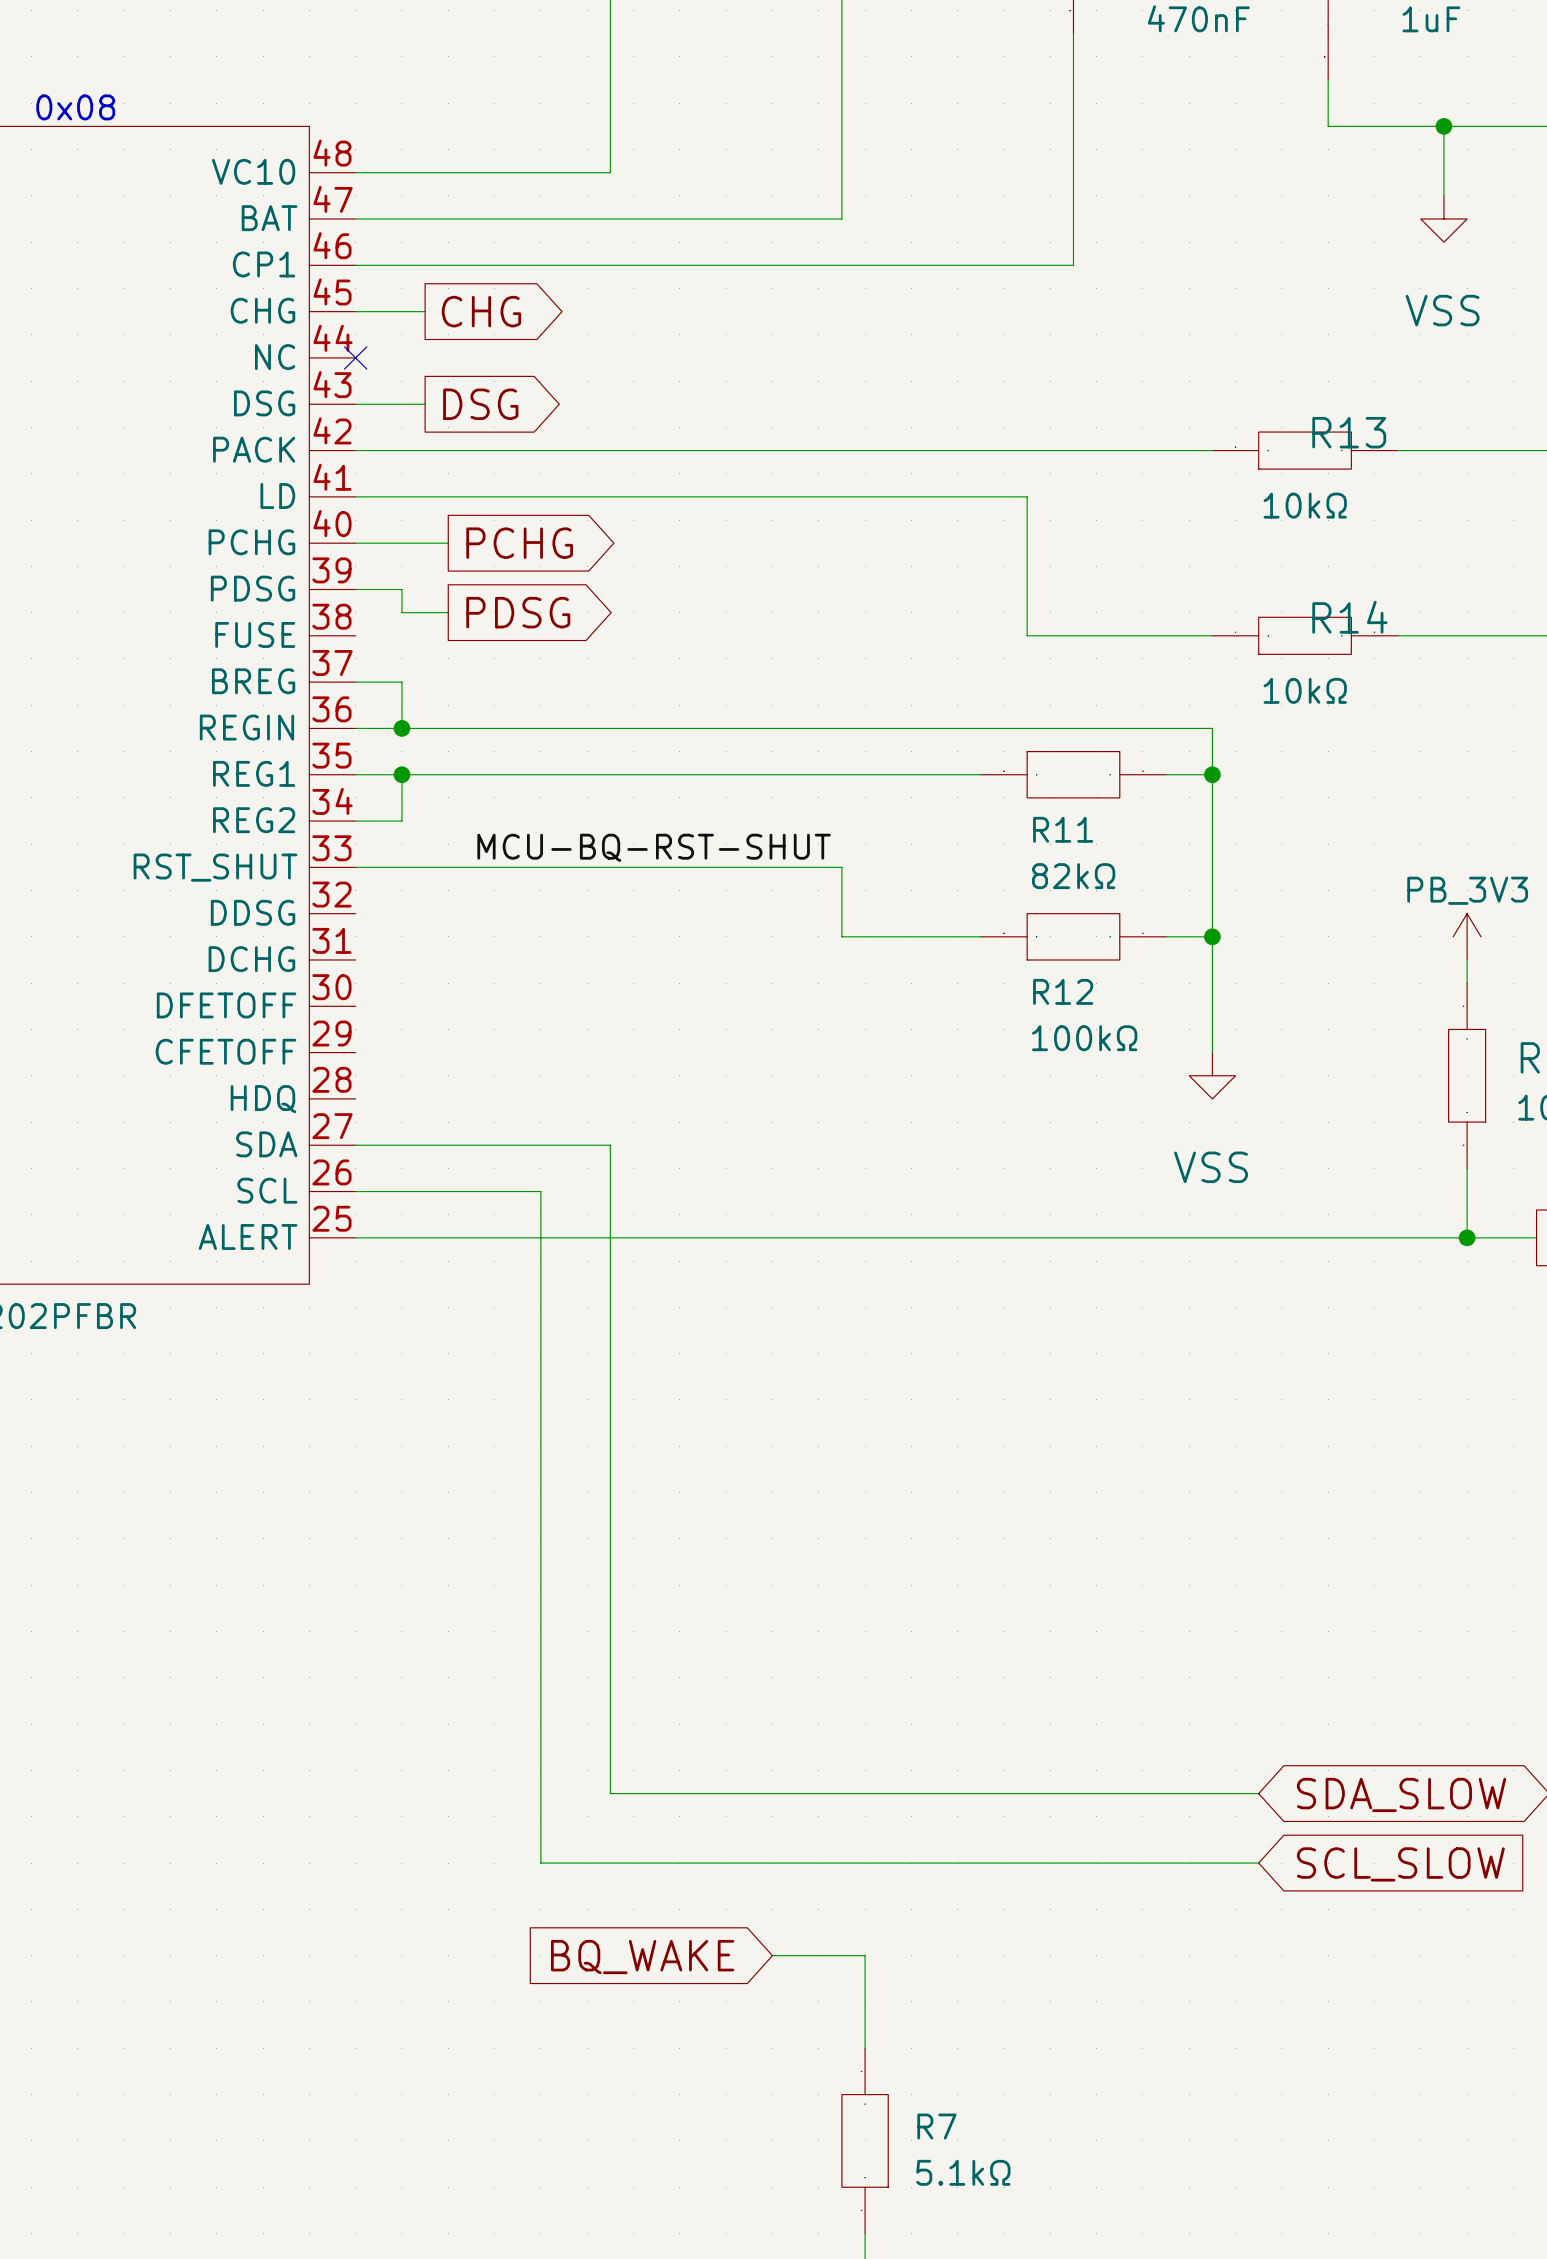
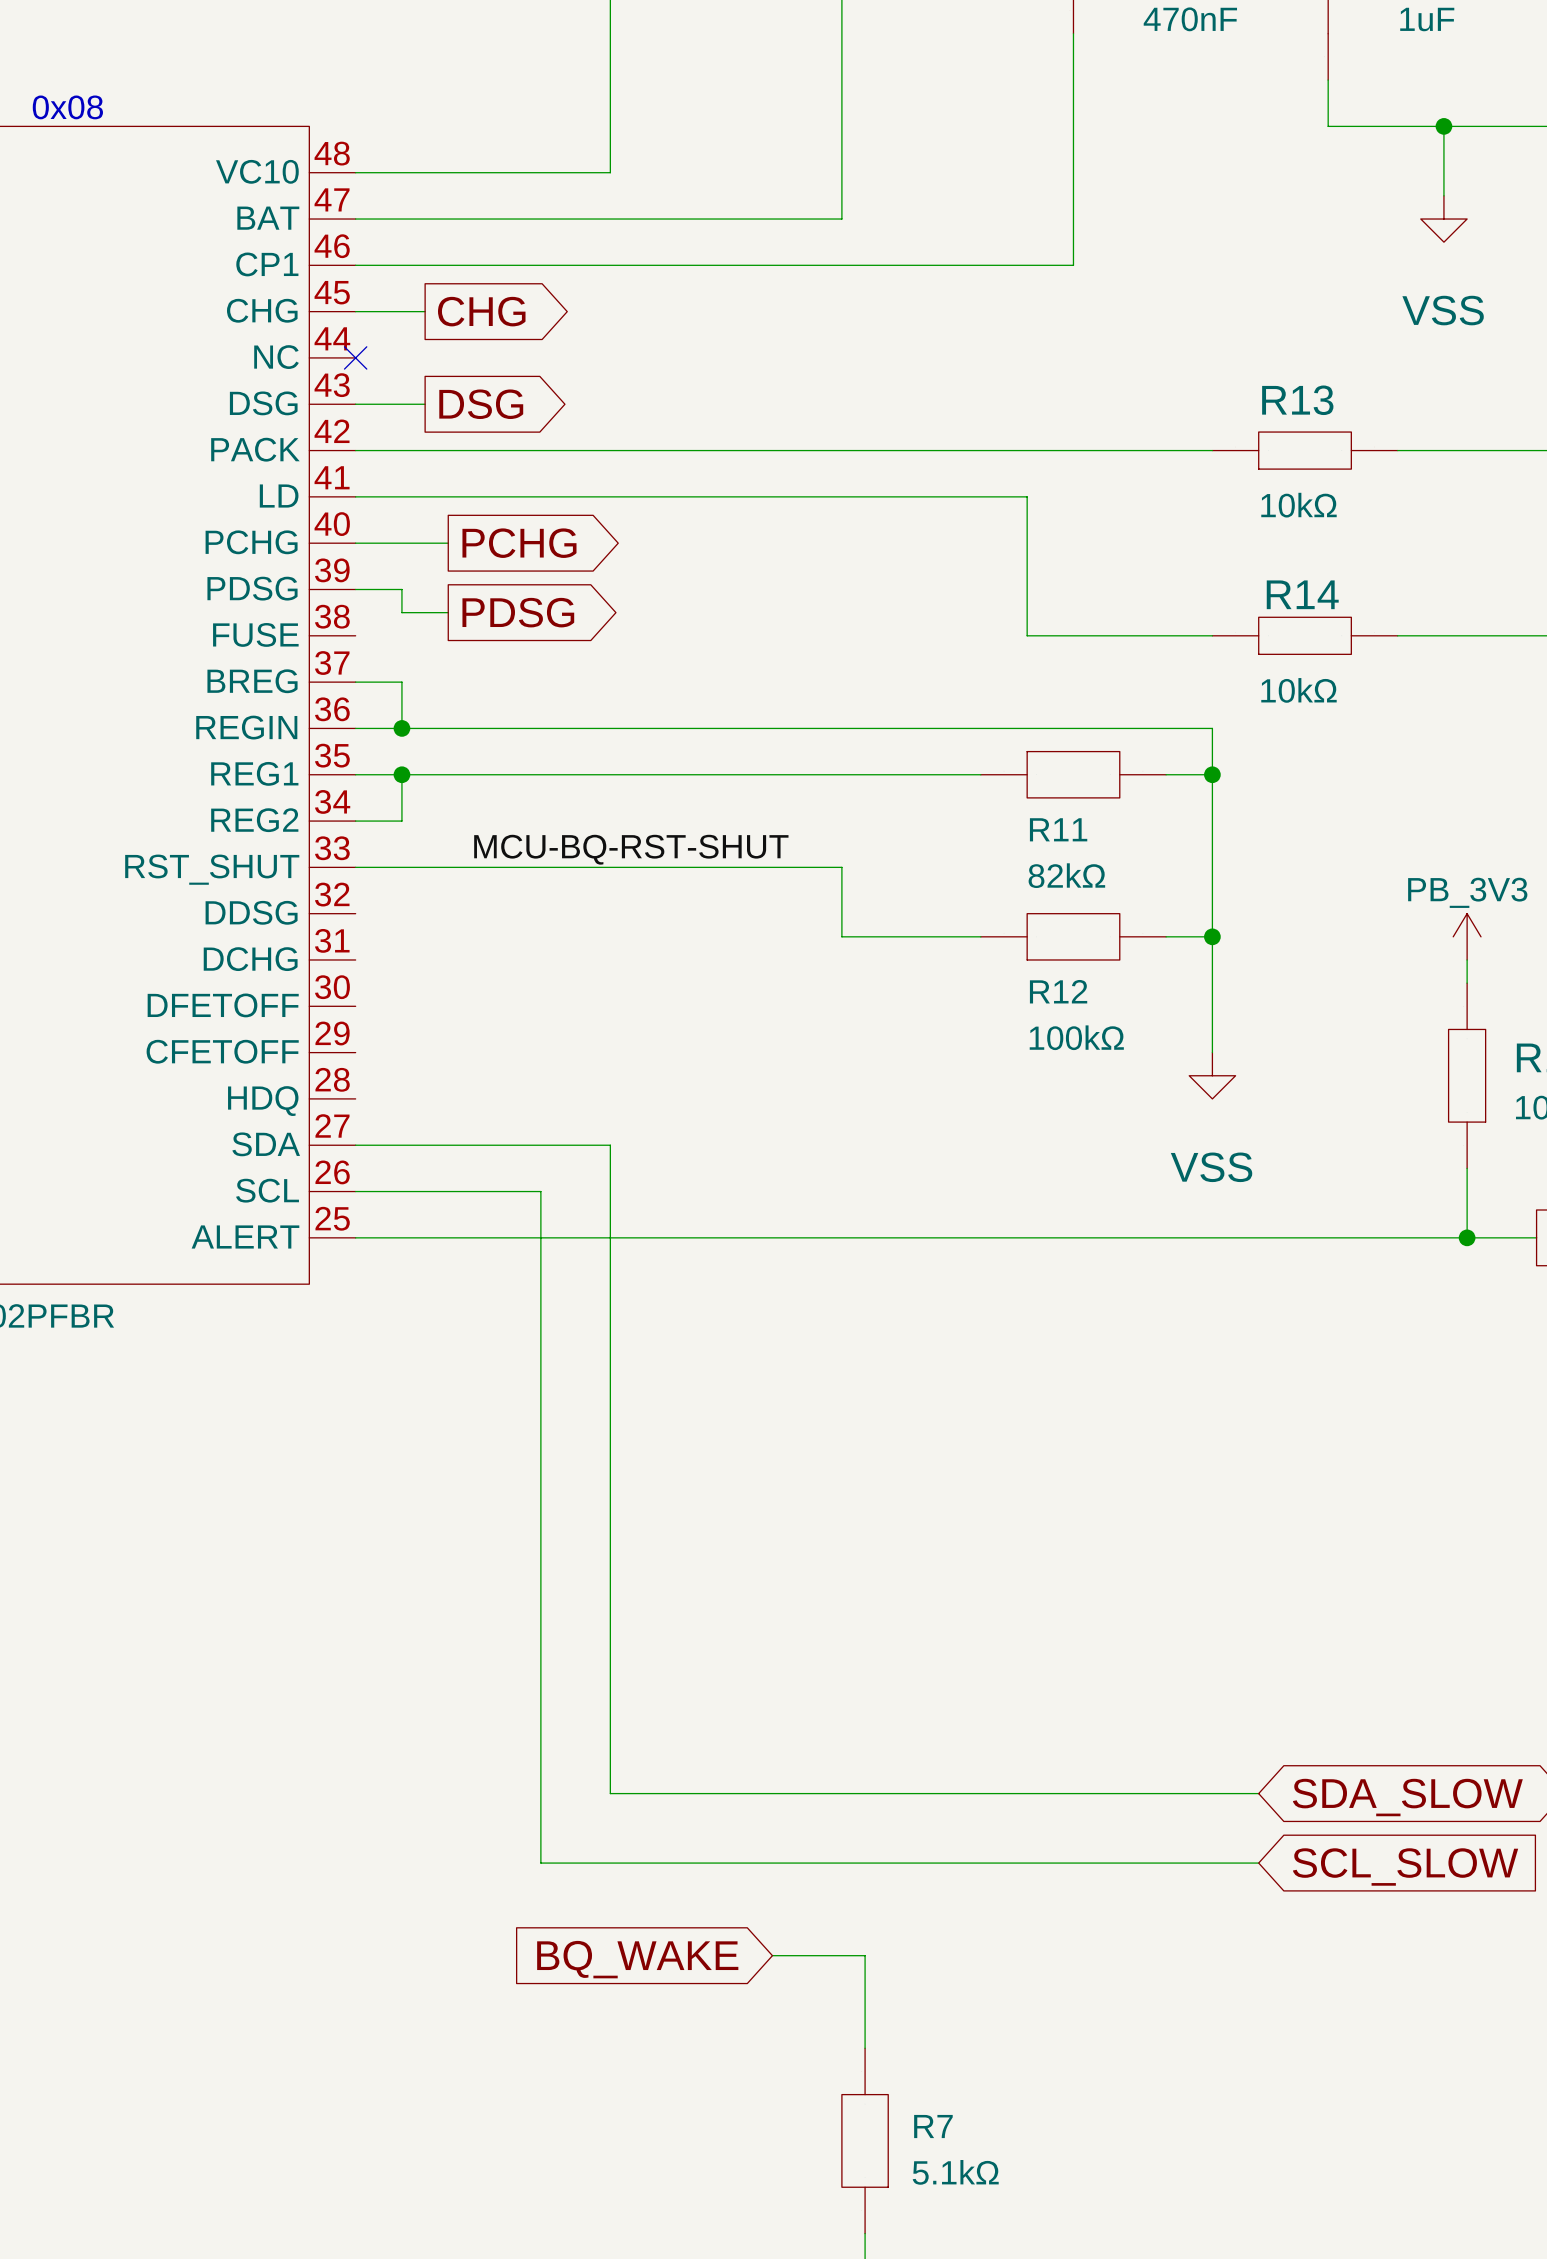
R13 name position: R13 (1349, 432) -> R13 (1297, 400)
R14 name position: R14 (1349, 617) -> R14 (1302, 594)

